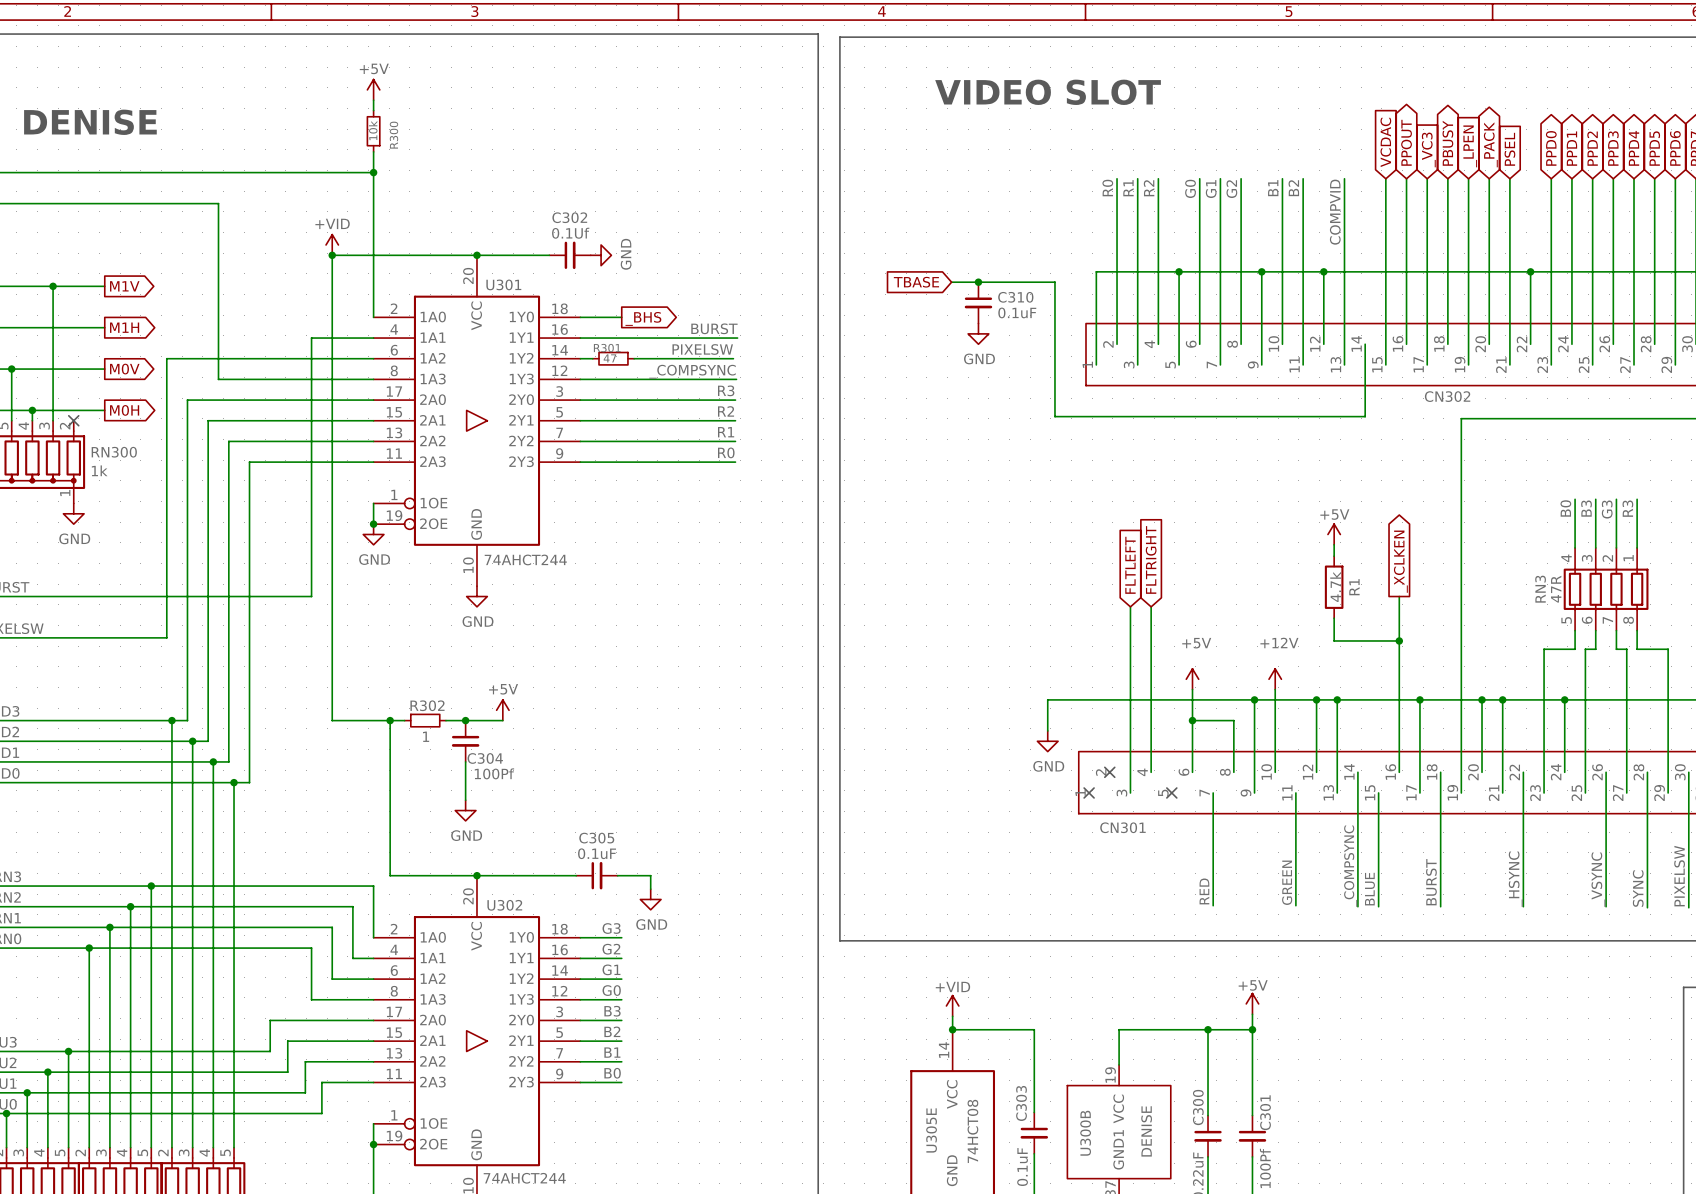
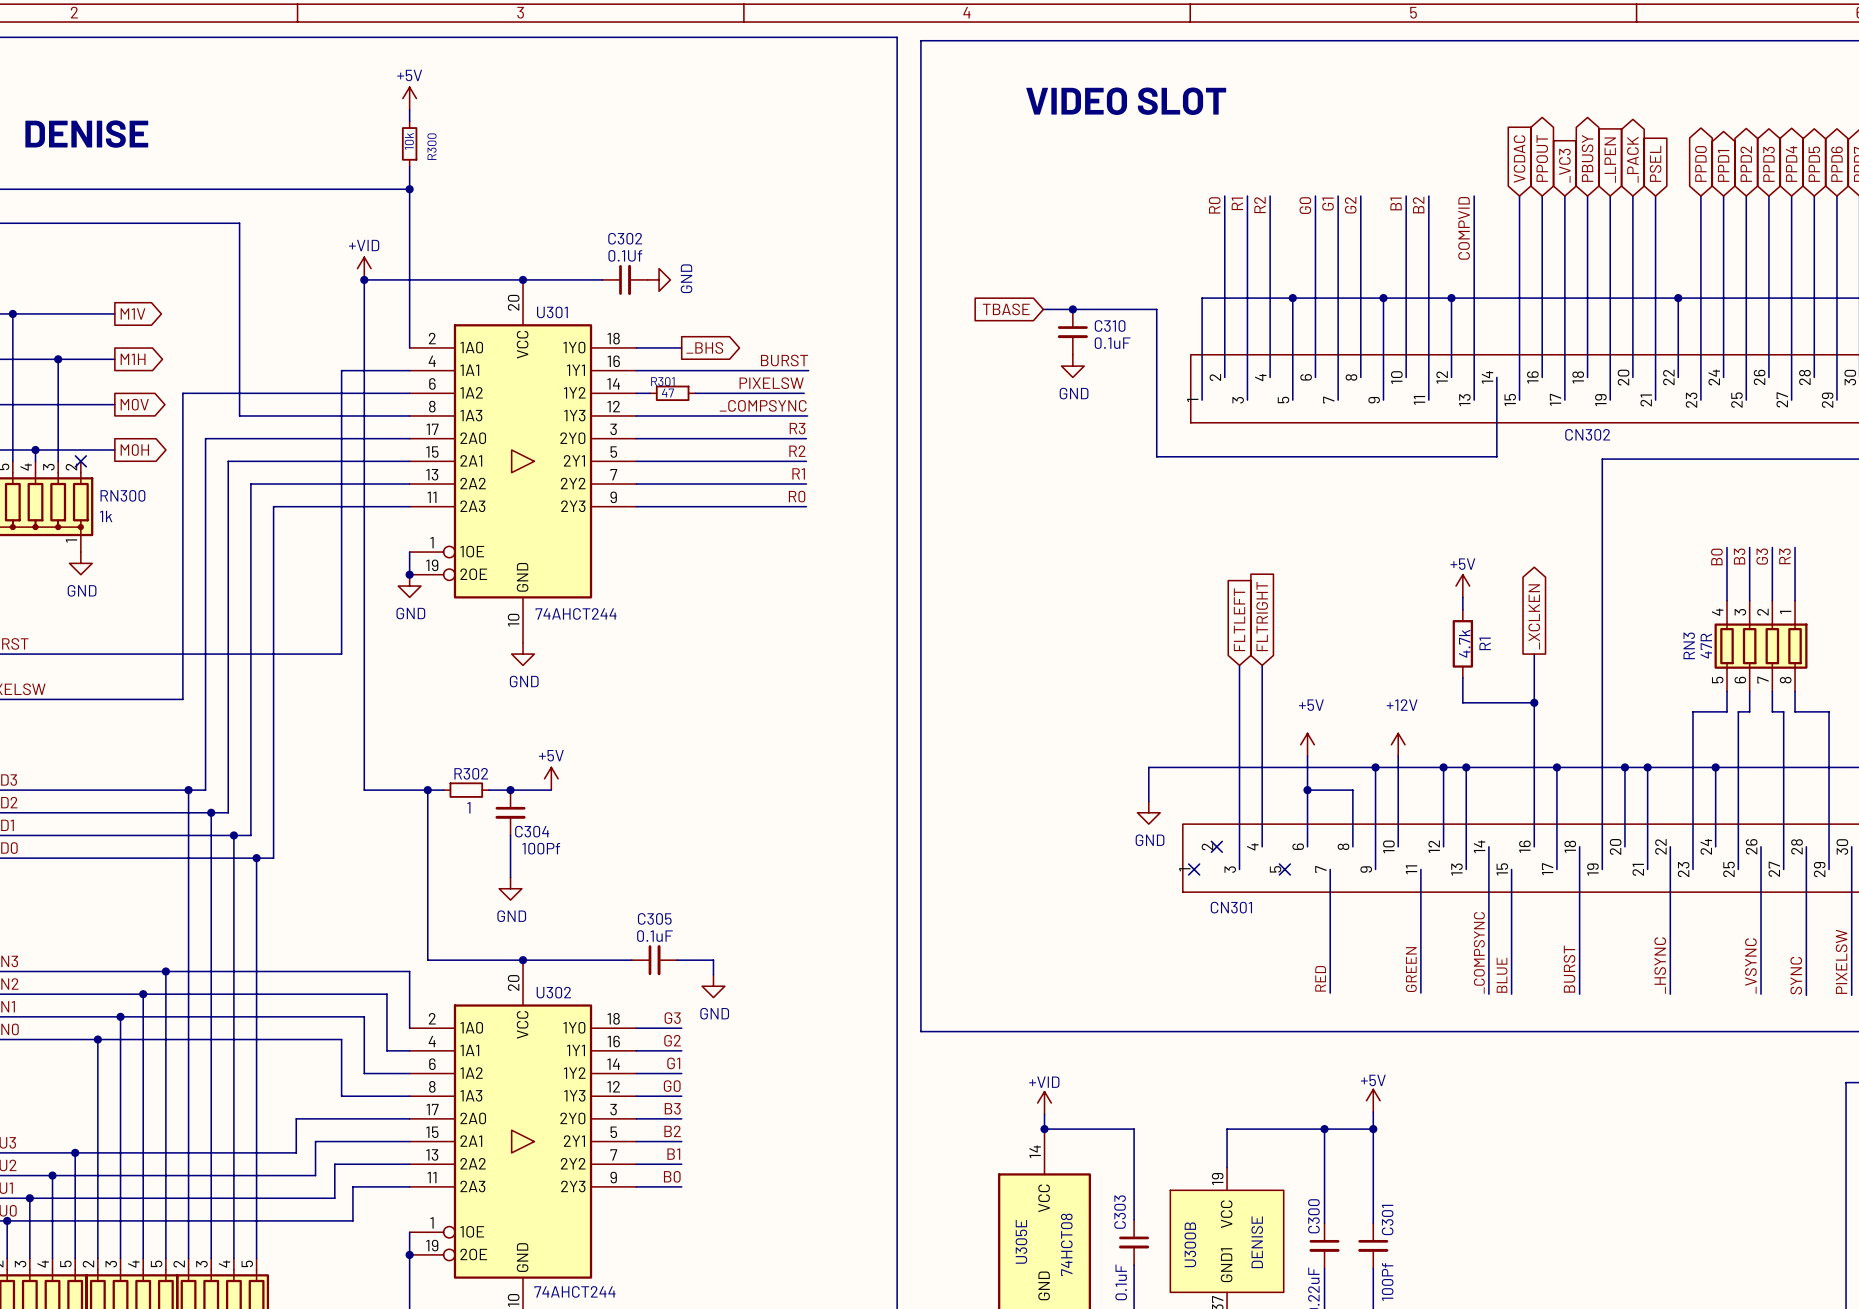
wire: none -> (12, 313) (12, 404)
junction: none -> (12, 313)
wire: (53, 286) (53, 327) -> none
junction: (53, 286) -> none
junction: none -> (58, 359)
junction: (11, 369) -> none

